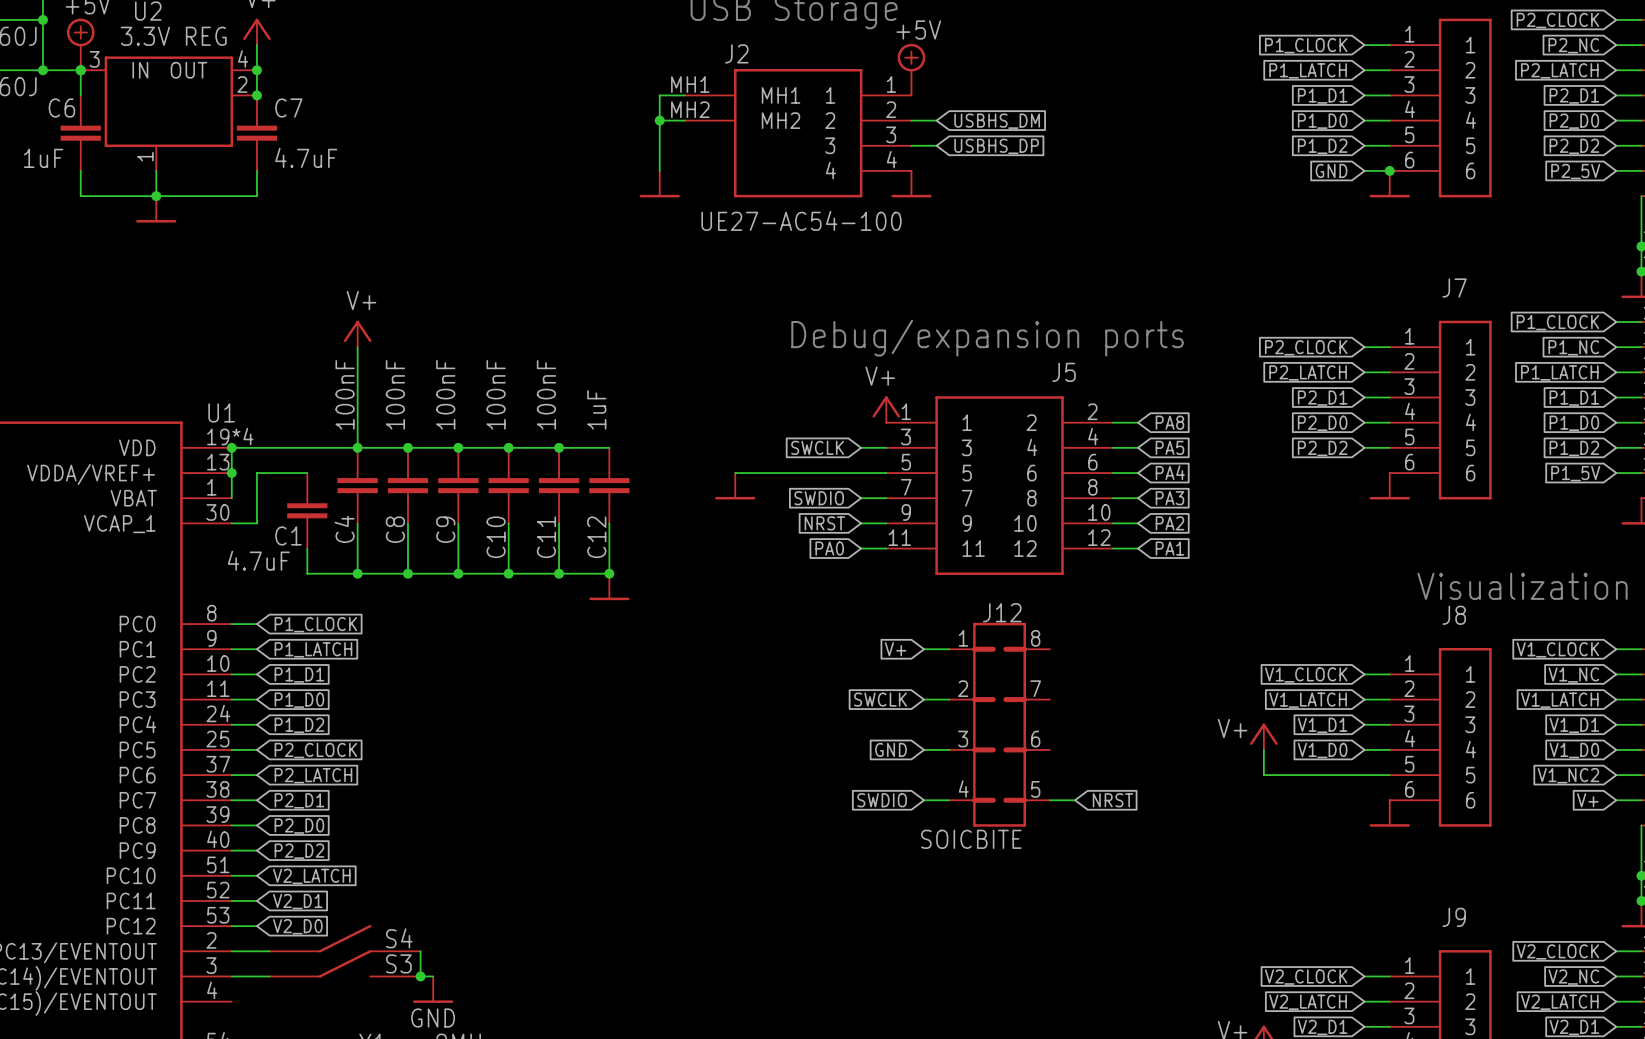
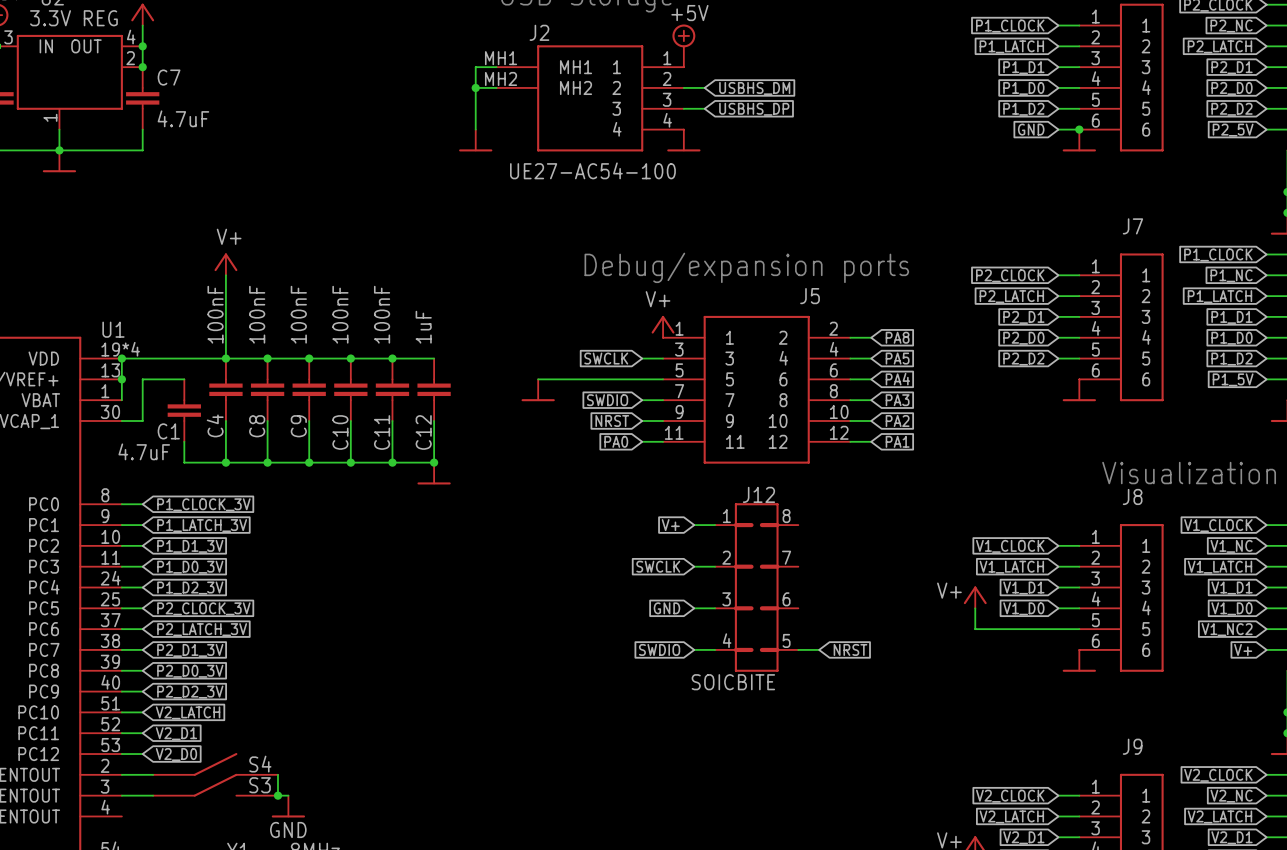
global label: P1_CLOCK (315, 624) -> P1_CLOCK_3V (203, 504)
global label: P1_LATCH (313, 649) -> P1_LATCH_3V (202, 525)
global label: P1_D1 (299, 675) -> P1_D1_3V (190, 546)
global label: P1_D0 (299, 700) -> P1_D0_3V (190, 567)
global label: P1_D2 (299, 725) -> P1_D2_3V (190, 588)
global label: P2_CLOCK (315, 750) -> P2_CLOCK_3V (203, 608)
global label: P2_LATCH (313, 775) -> P2_LATCH_3V (202, 629)
global label: P2_D1 (299, 800) -> P2_D1_3V (190, 650)
global label: P2_D0 (299, 826) -> P2_D0_3V (190, 671)
global label: P2_D2 (299, 851) -> P2_D2_3V (190, 692)

